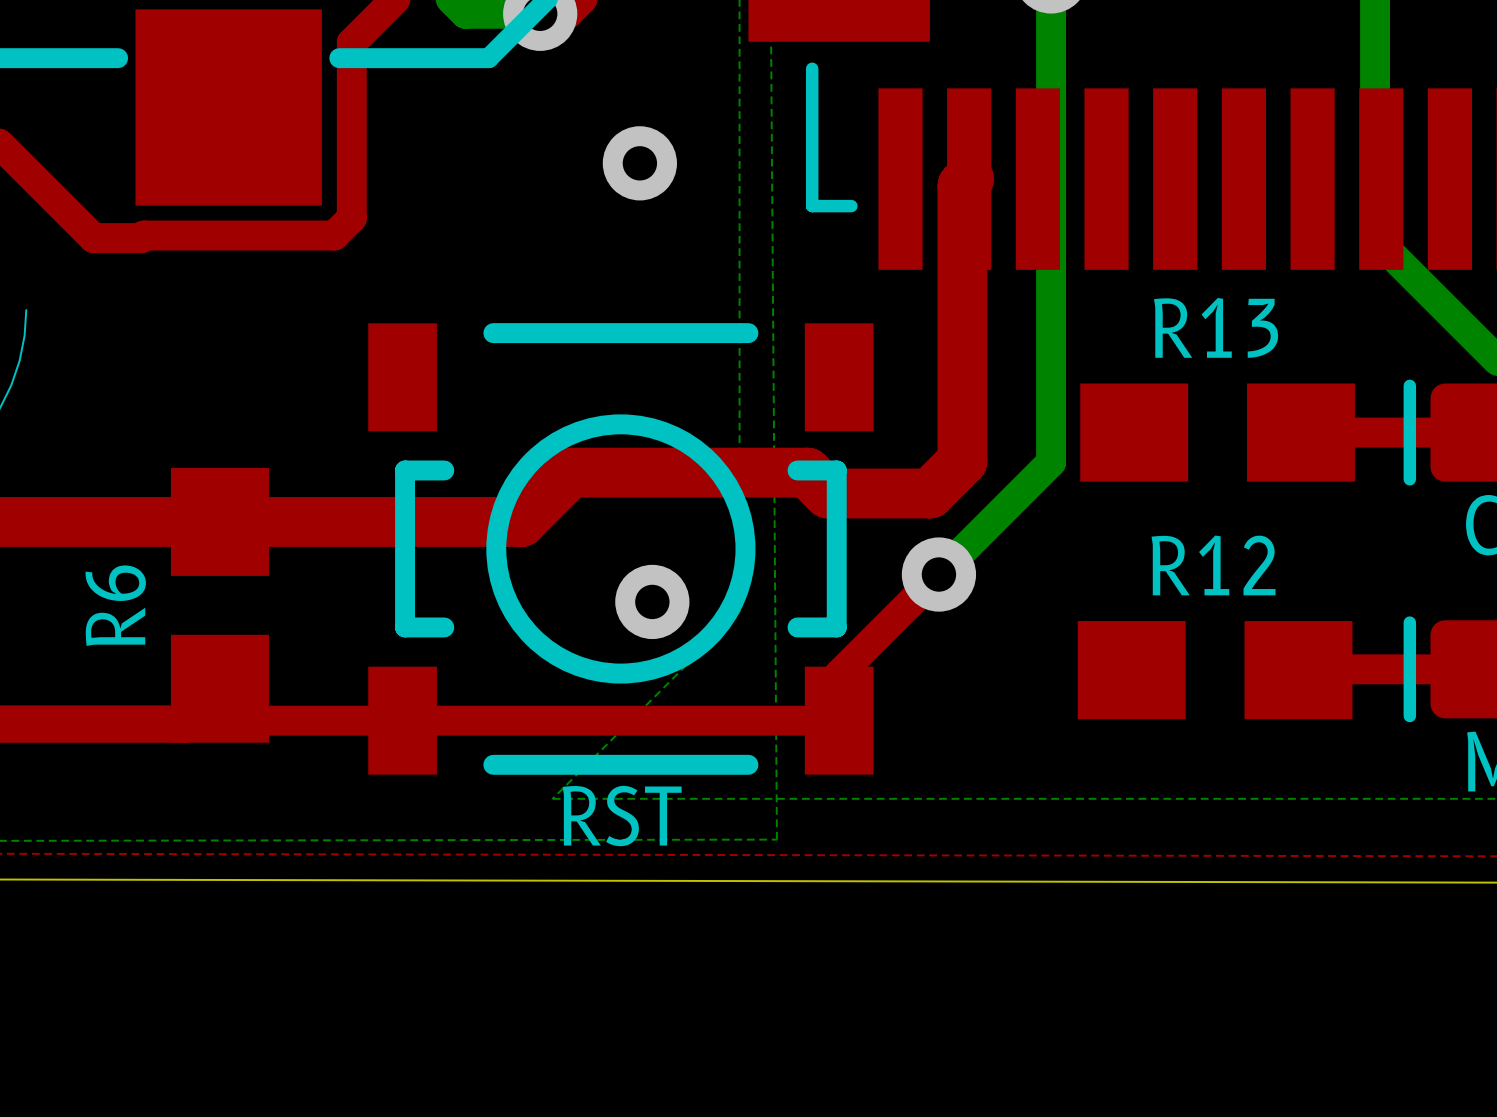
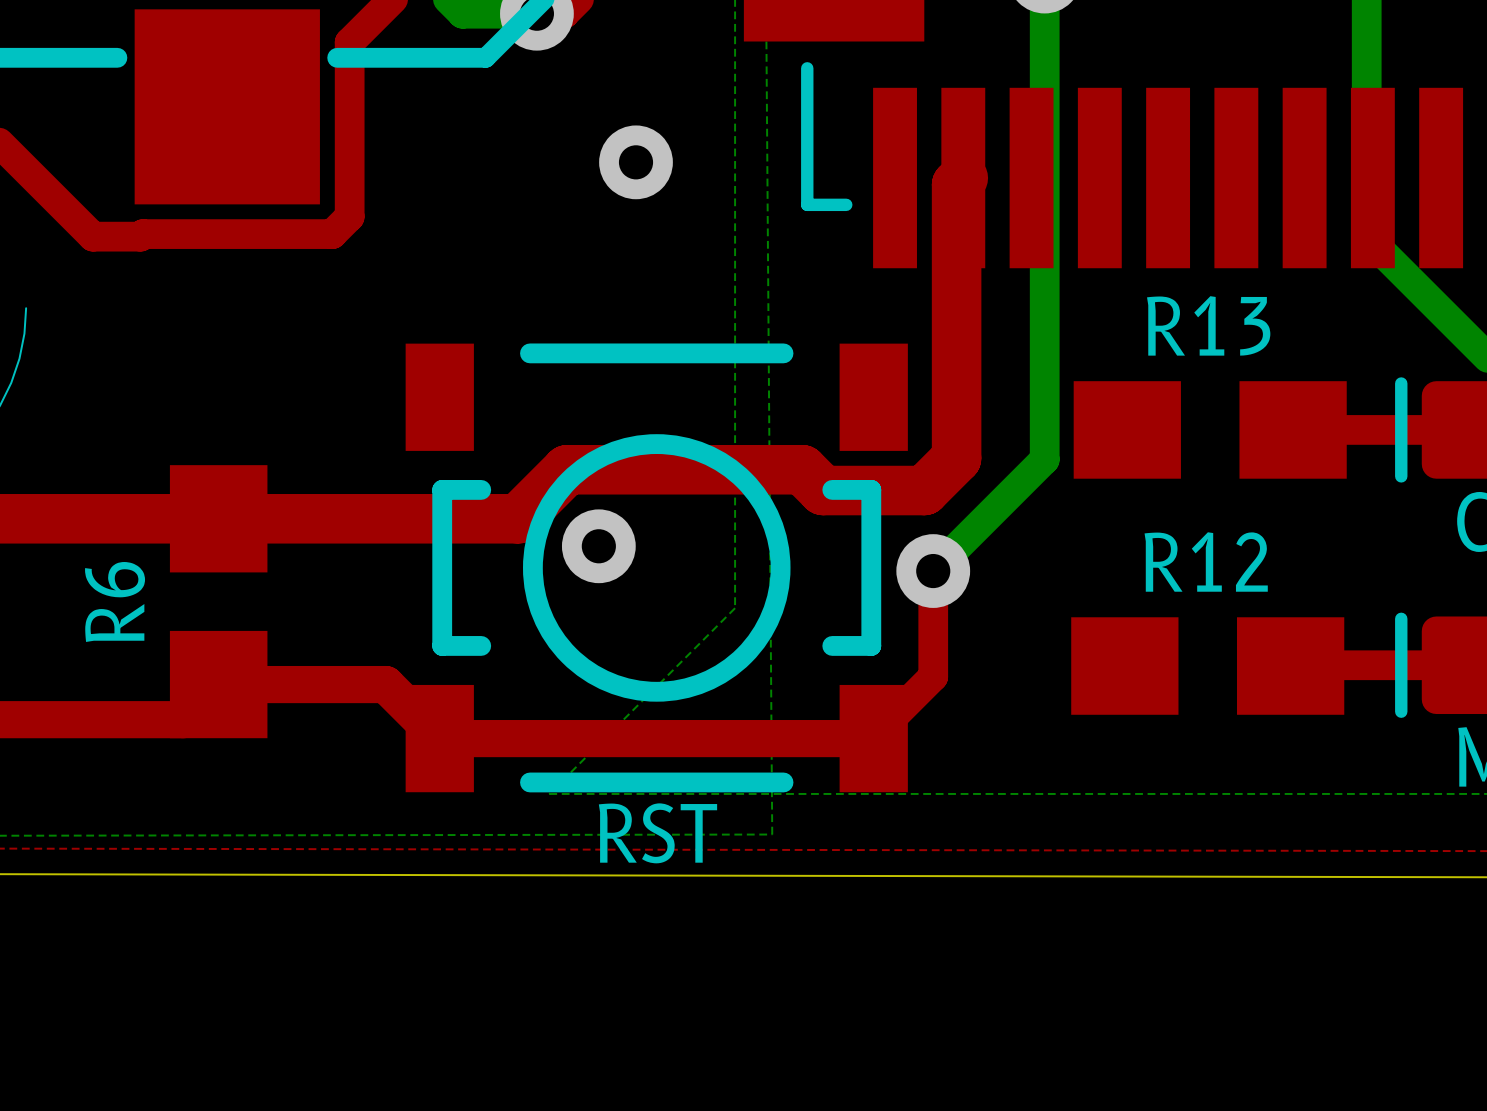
RST position: (620, 548) -> (656, 567)
top track: (938, 574) (839, 674) (839, 720) (251, 720) (220, 688) -> (873, 738) (439, 738) (385, 684) (218, 684)
top track: none -> (933, 571) (933, 676) (871, 738)
via position: (652, 601) -> (598, 546)

